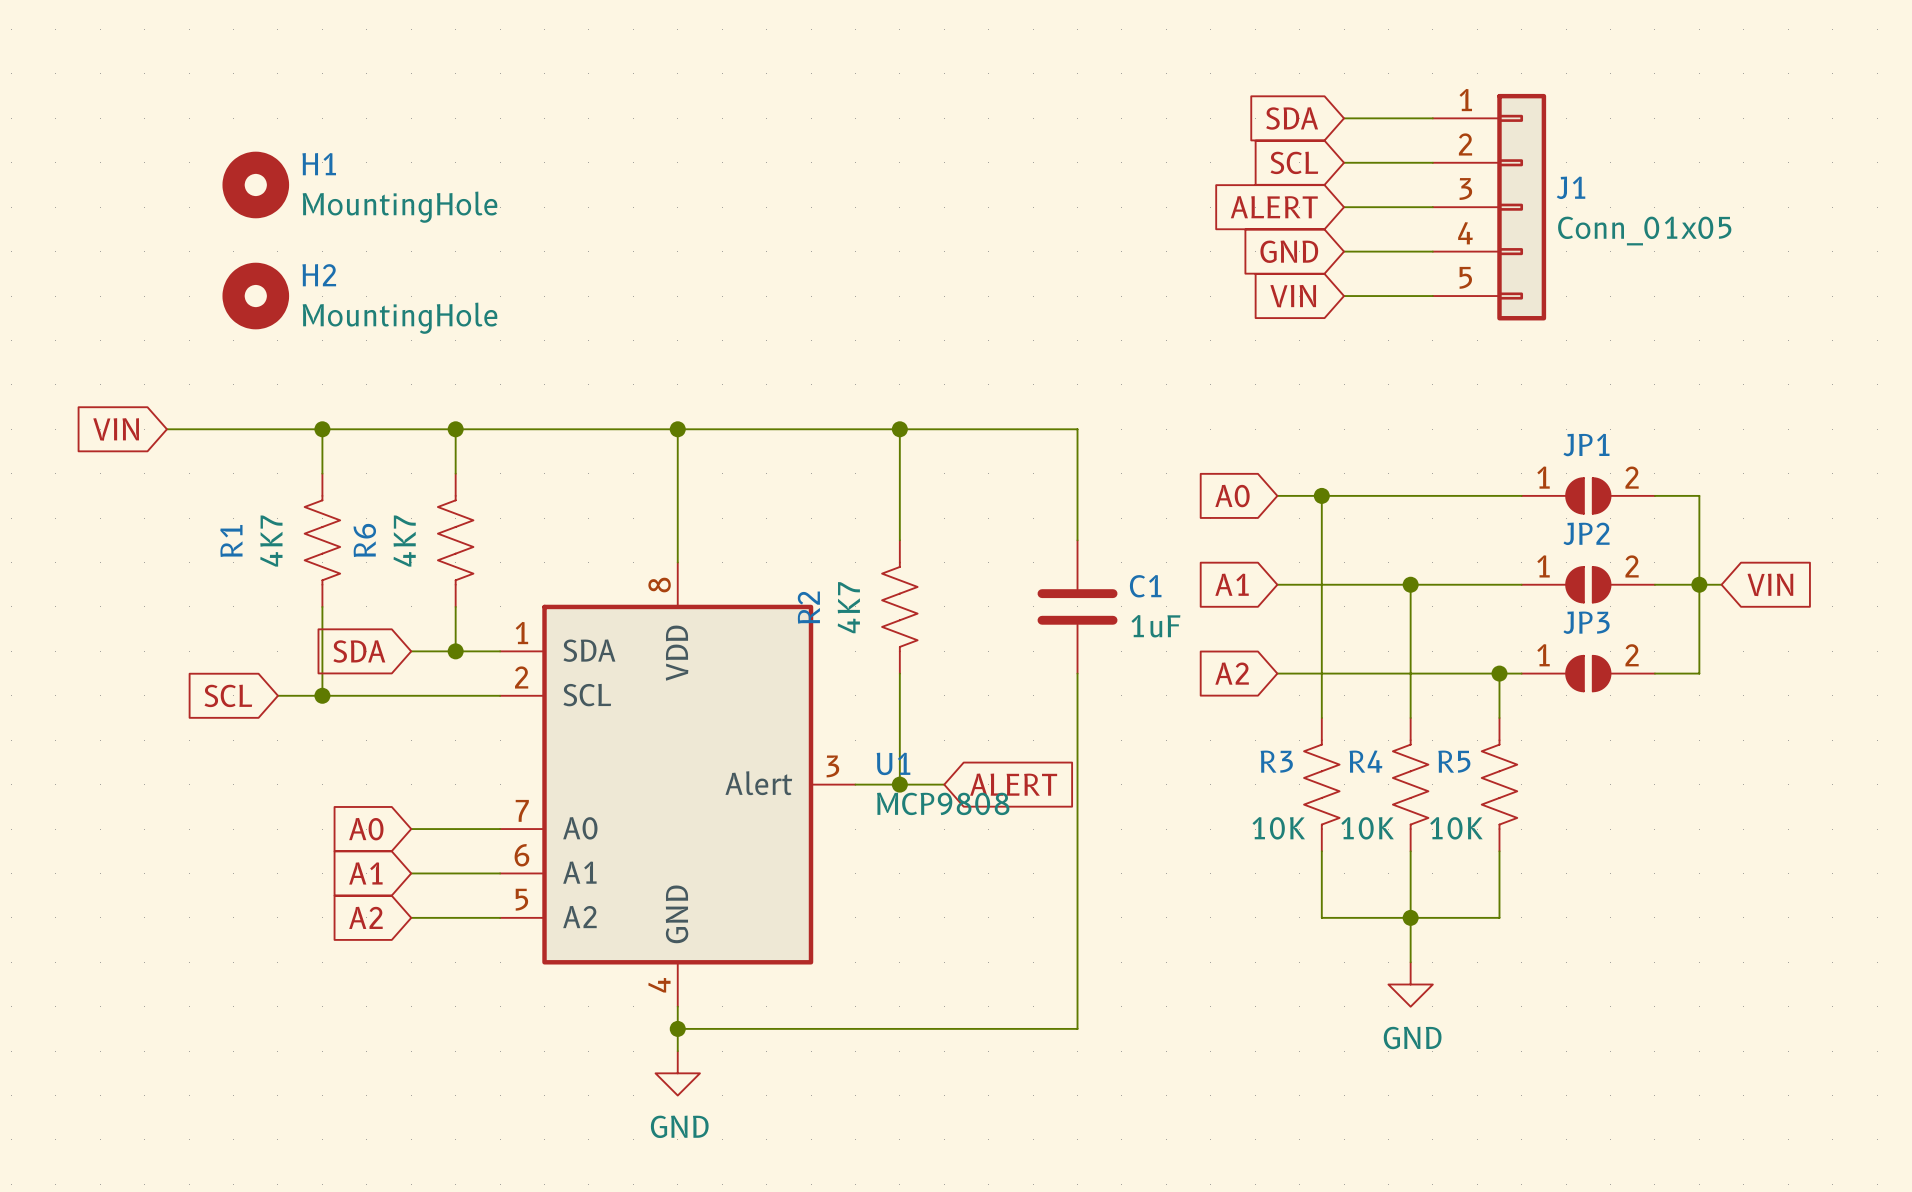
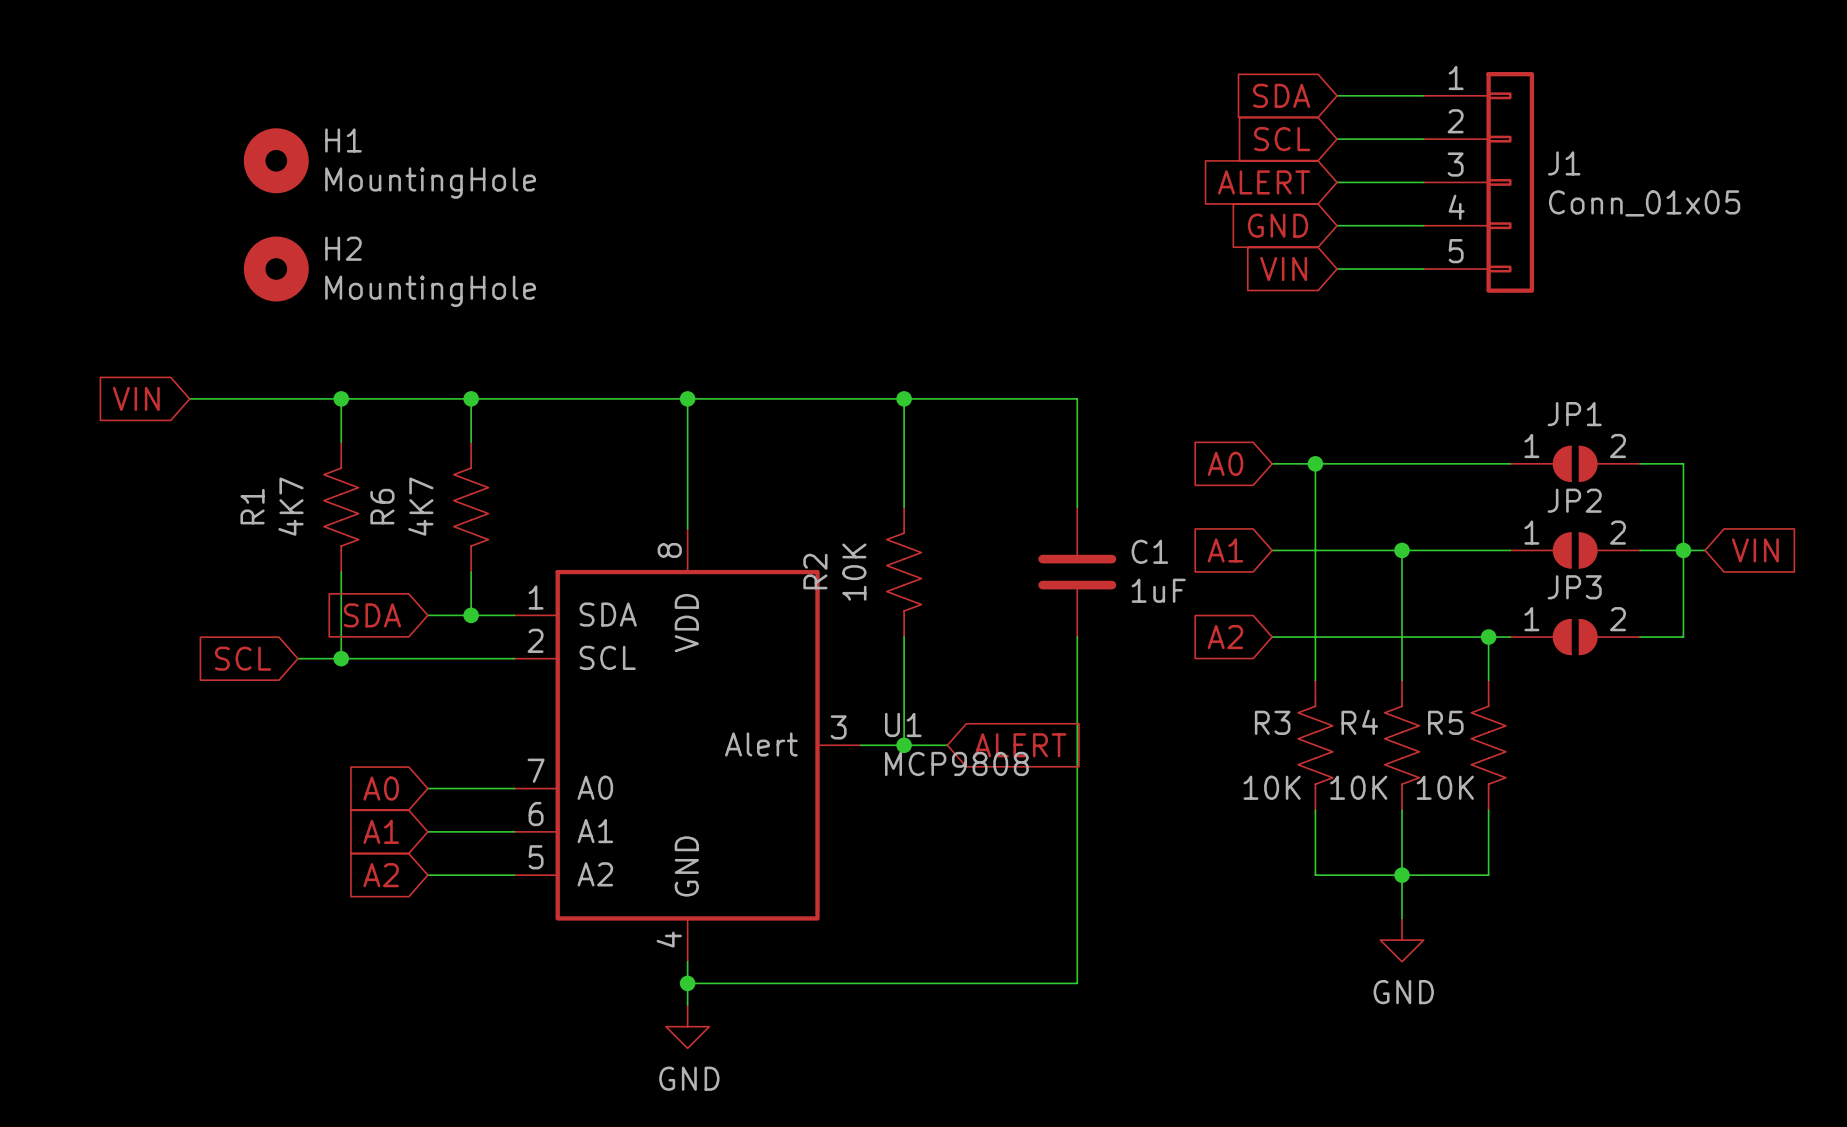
R2 value: 4K7 (848, 607) -> 10K (854, 572)

